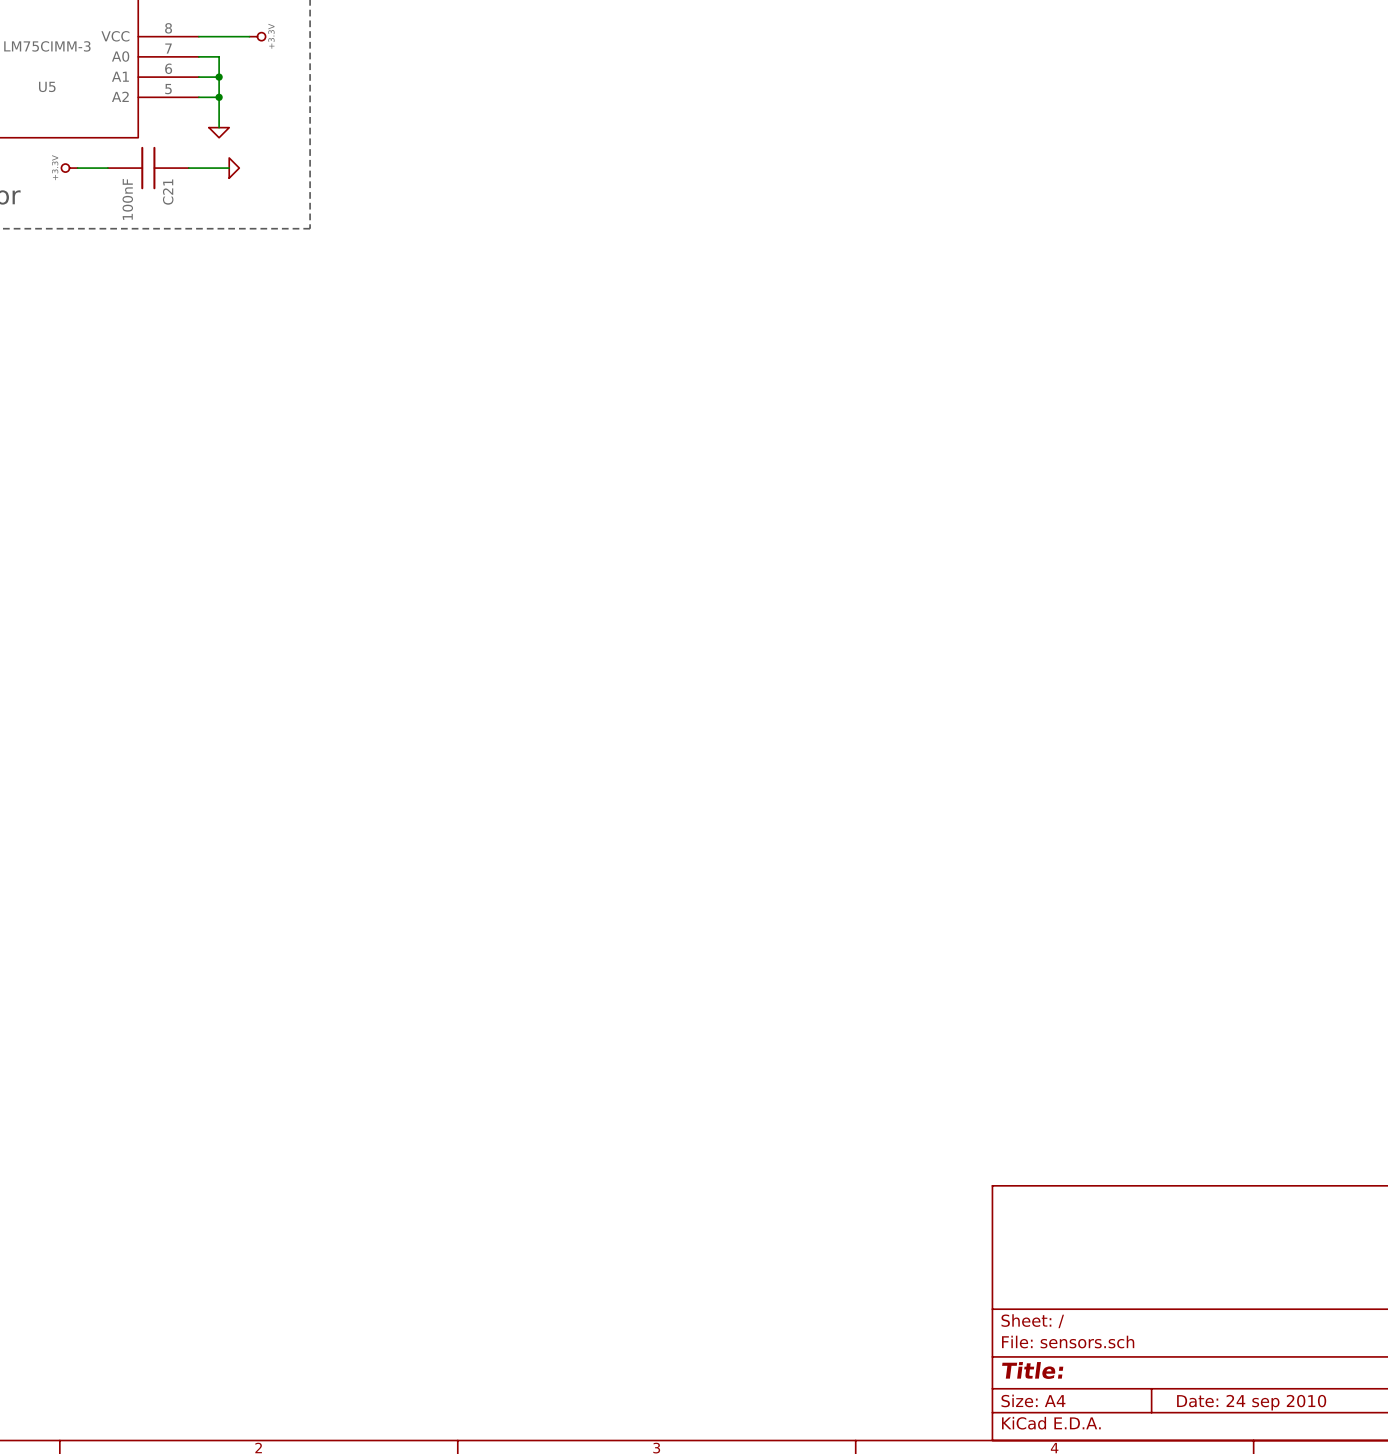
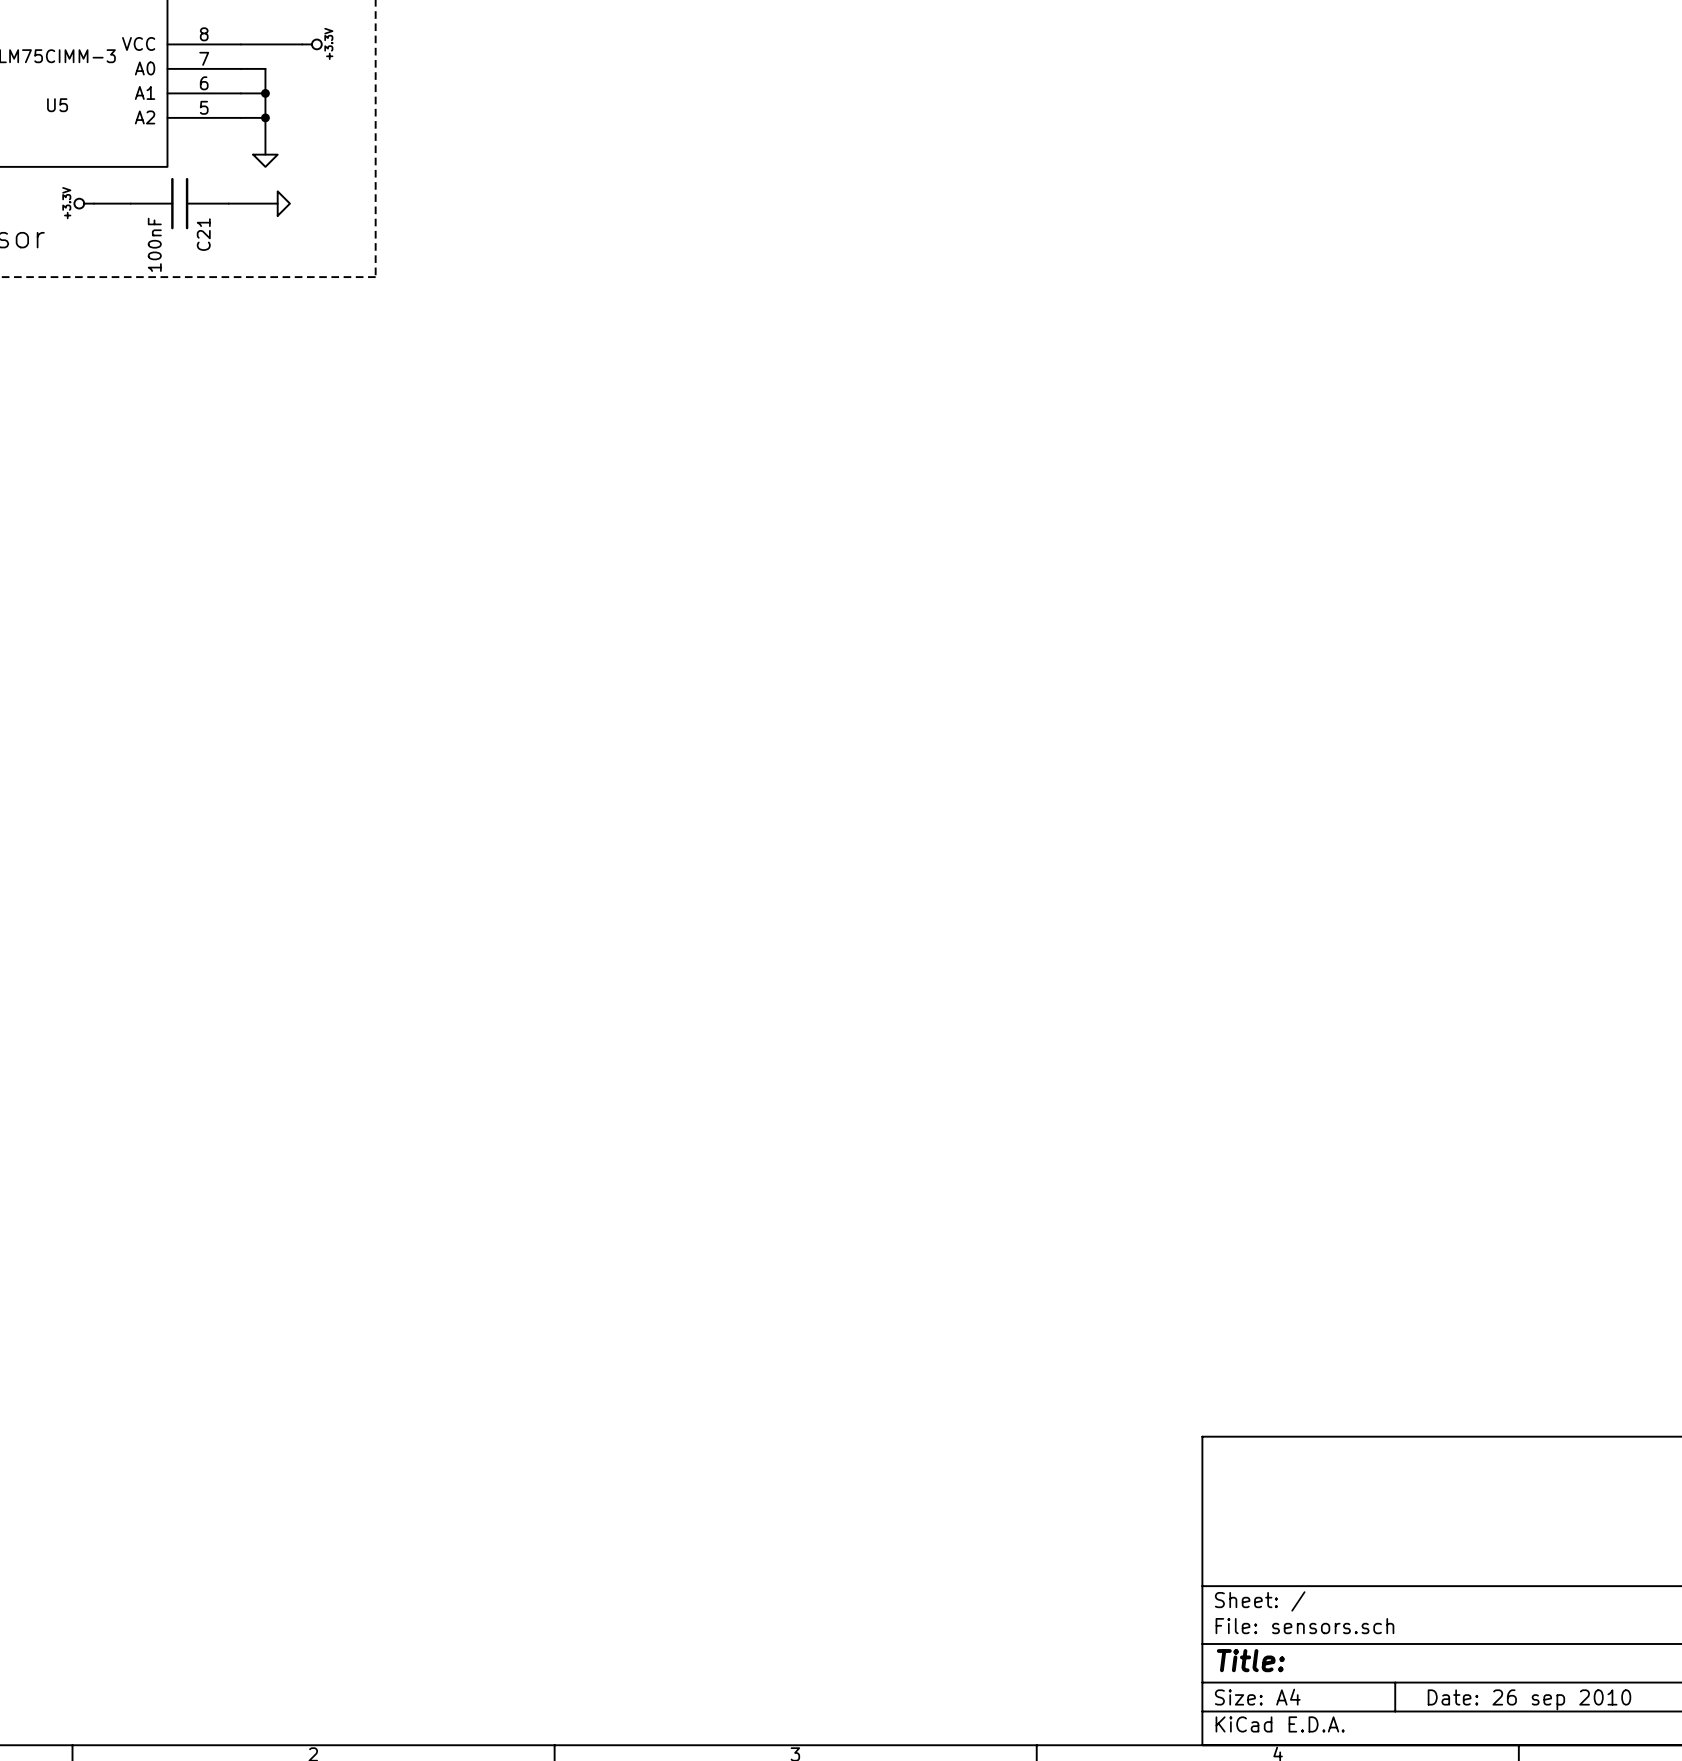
title block: Date: 24 sep 2010 (1251, 1402) -> Date: 26 sep 2010 (1529, 1699)

